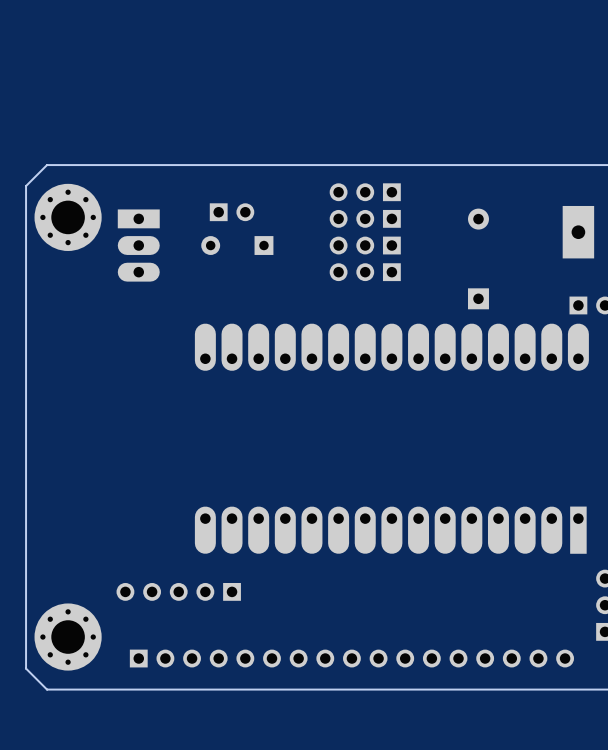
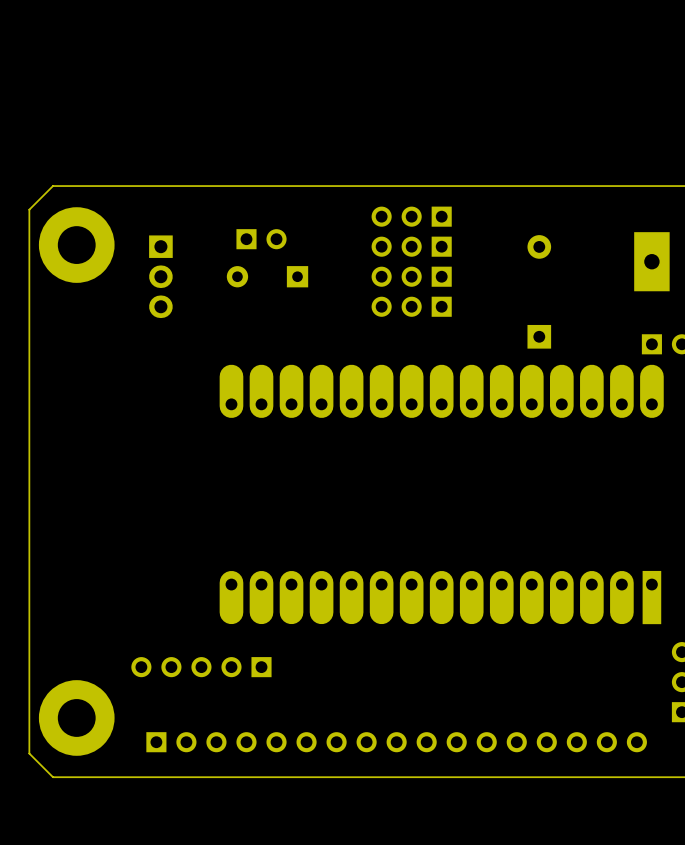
part footprint: [34, 183, 102, 251] -> [38, 207, 115, 283]
part footprint: [117, 209, 160, 282] -> [149, 235, 173, 319]
part footprint: [34, 603, 102, 671] -> [38, 680, 115, 756]

